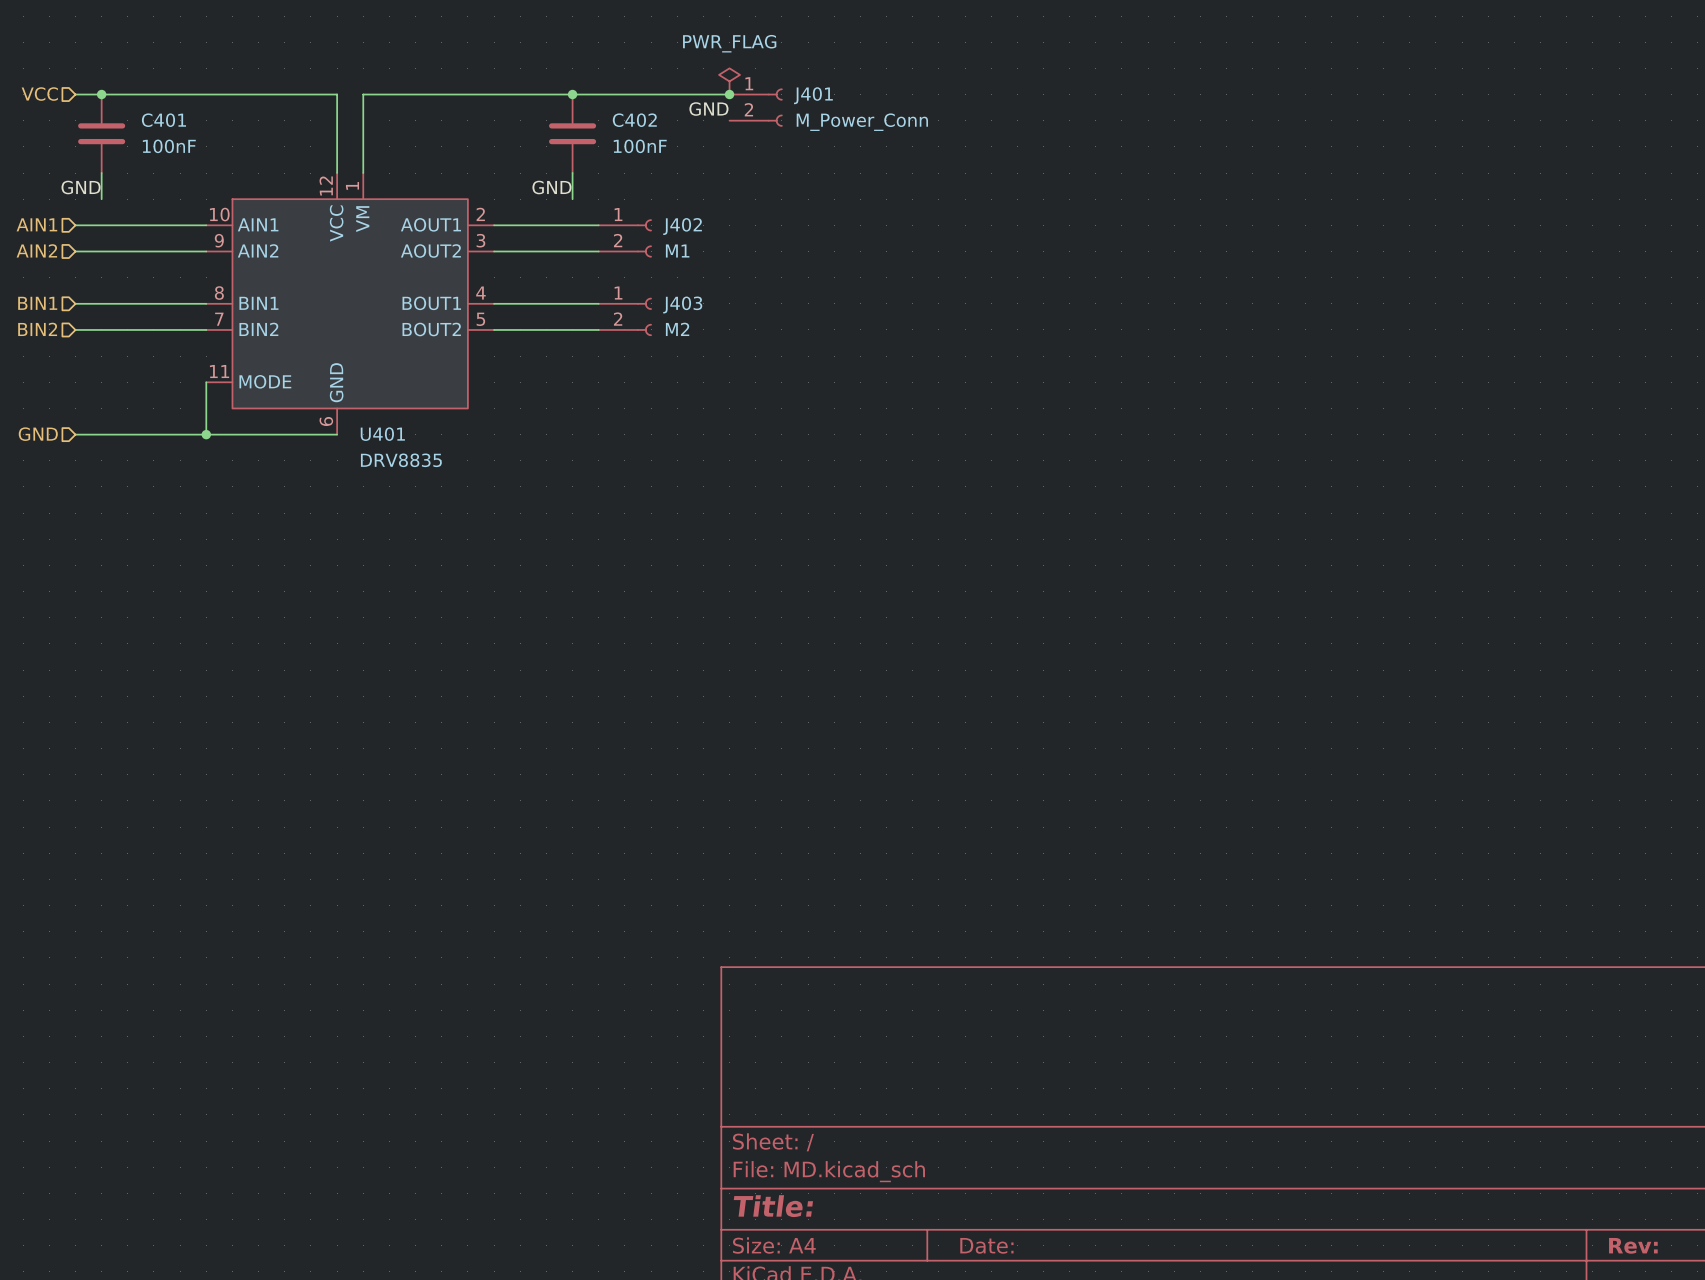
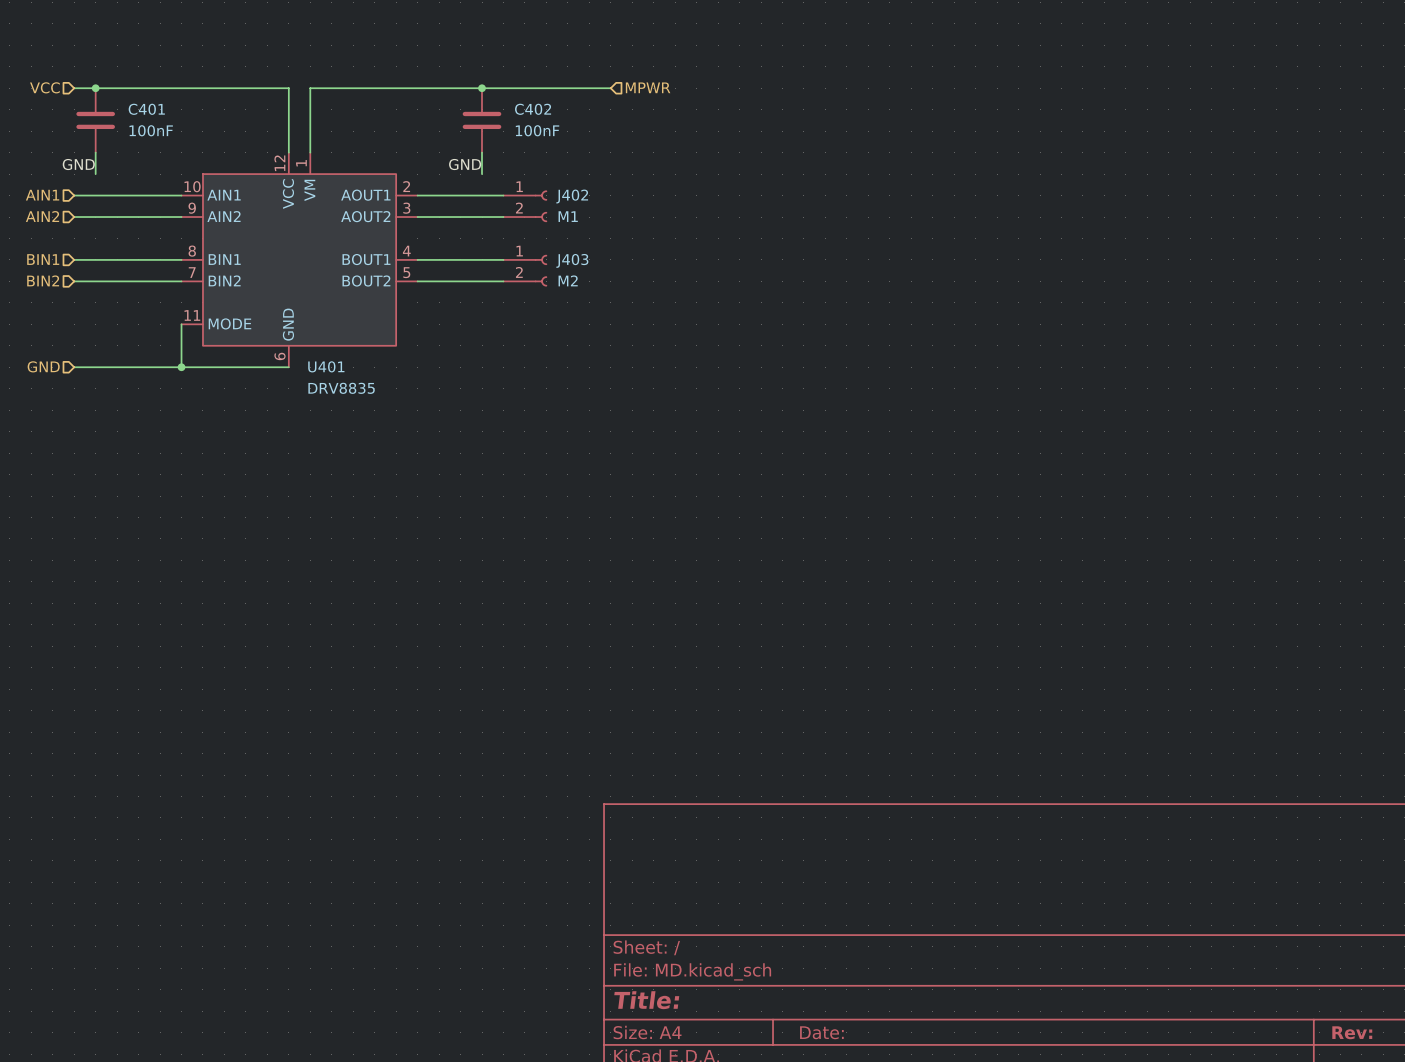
power symbol: PWR_FLAG (729, 81) -> none
junction: (729, 94) -> none
hierarchical label: none -> MPWR (648, 87)
J401: M_Power_Conn (756, 107) -> none
label: GND (708, 109) -> none

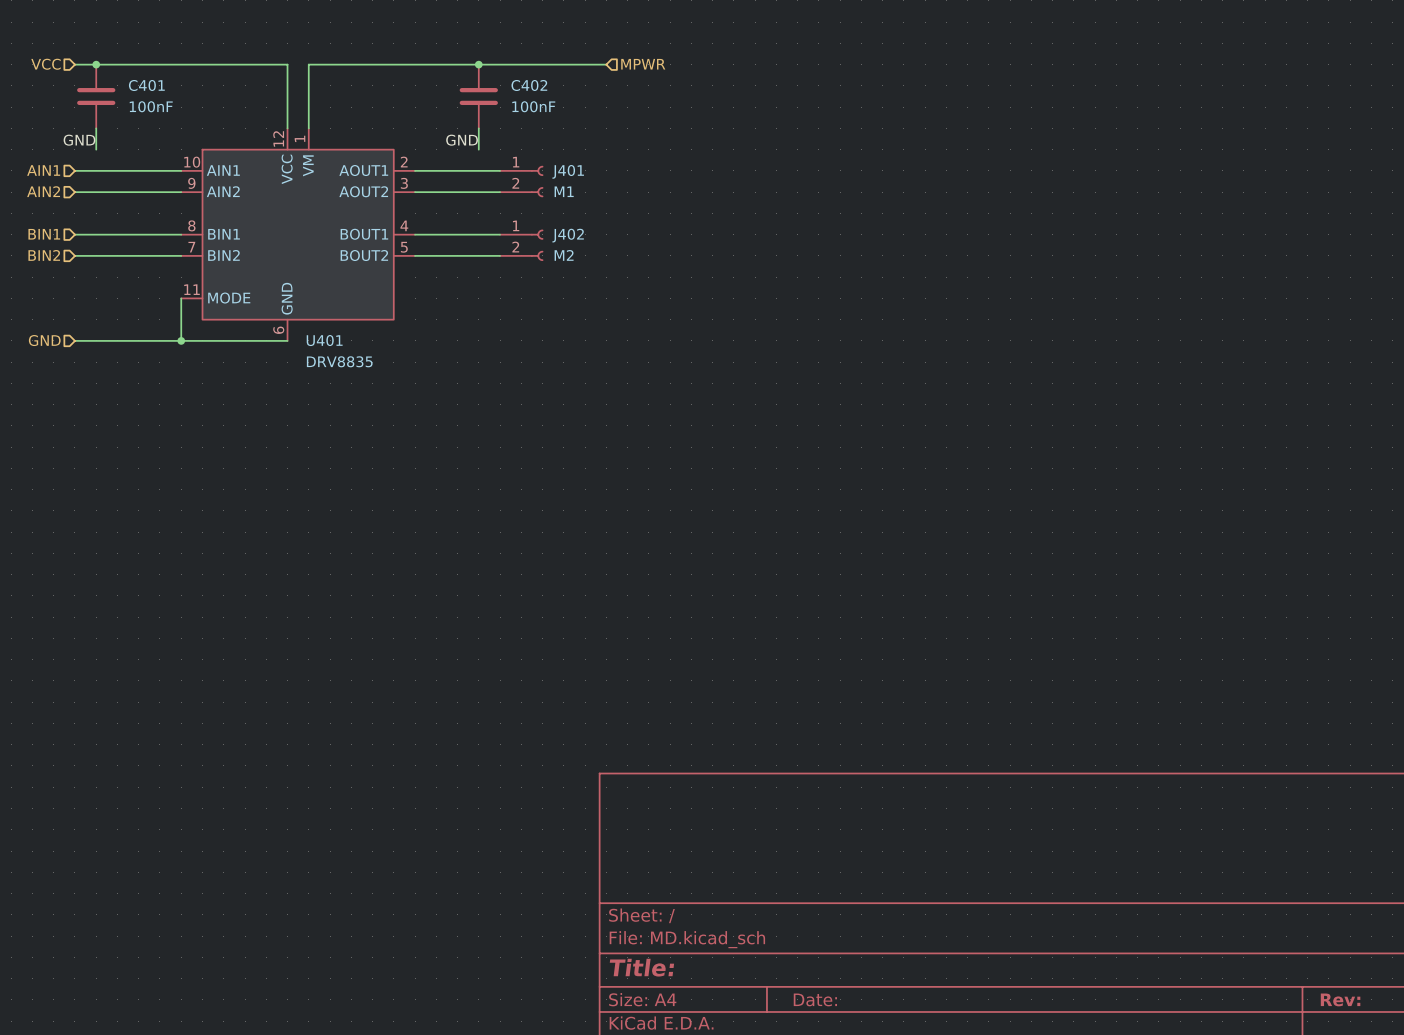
J402 name: J402 (572, 196) -> J401 (568, 171)
J403 name: J403 (572, 260) -> J402 (568, 235)

